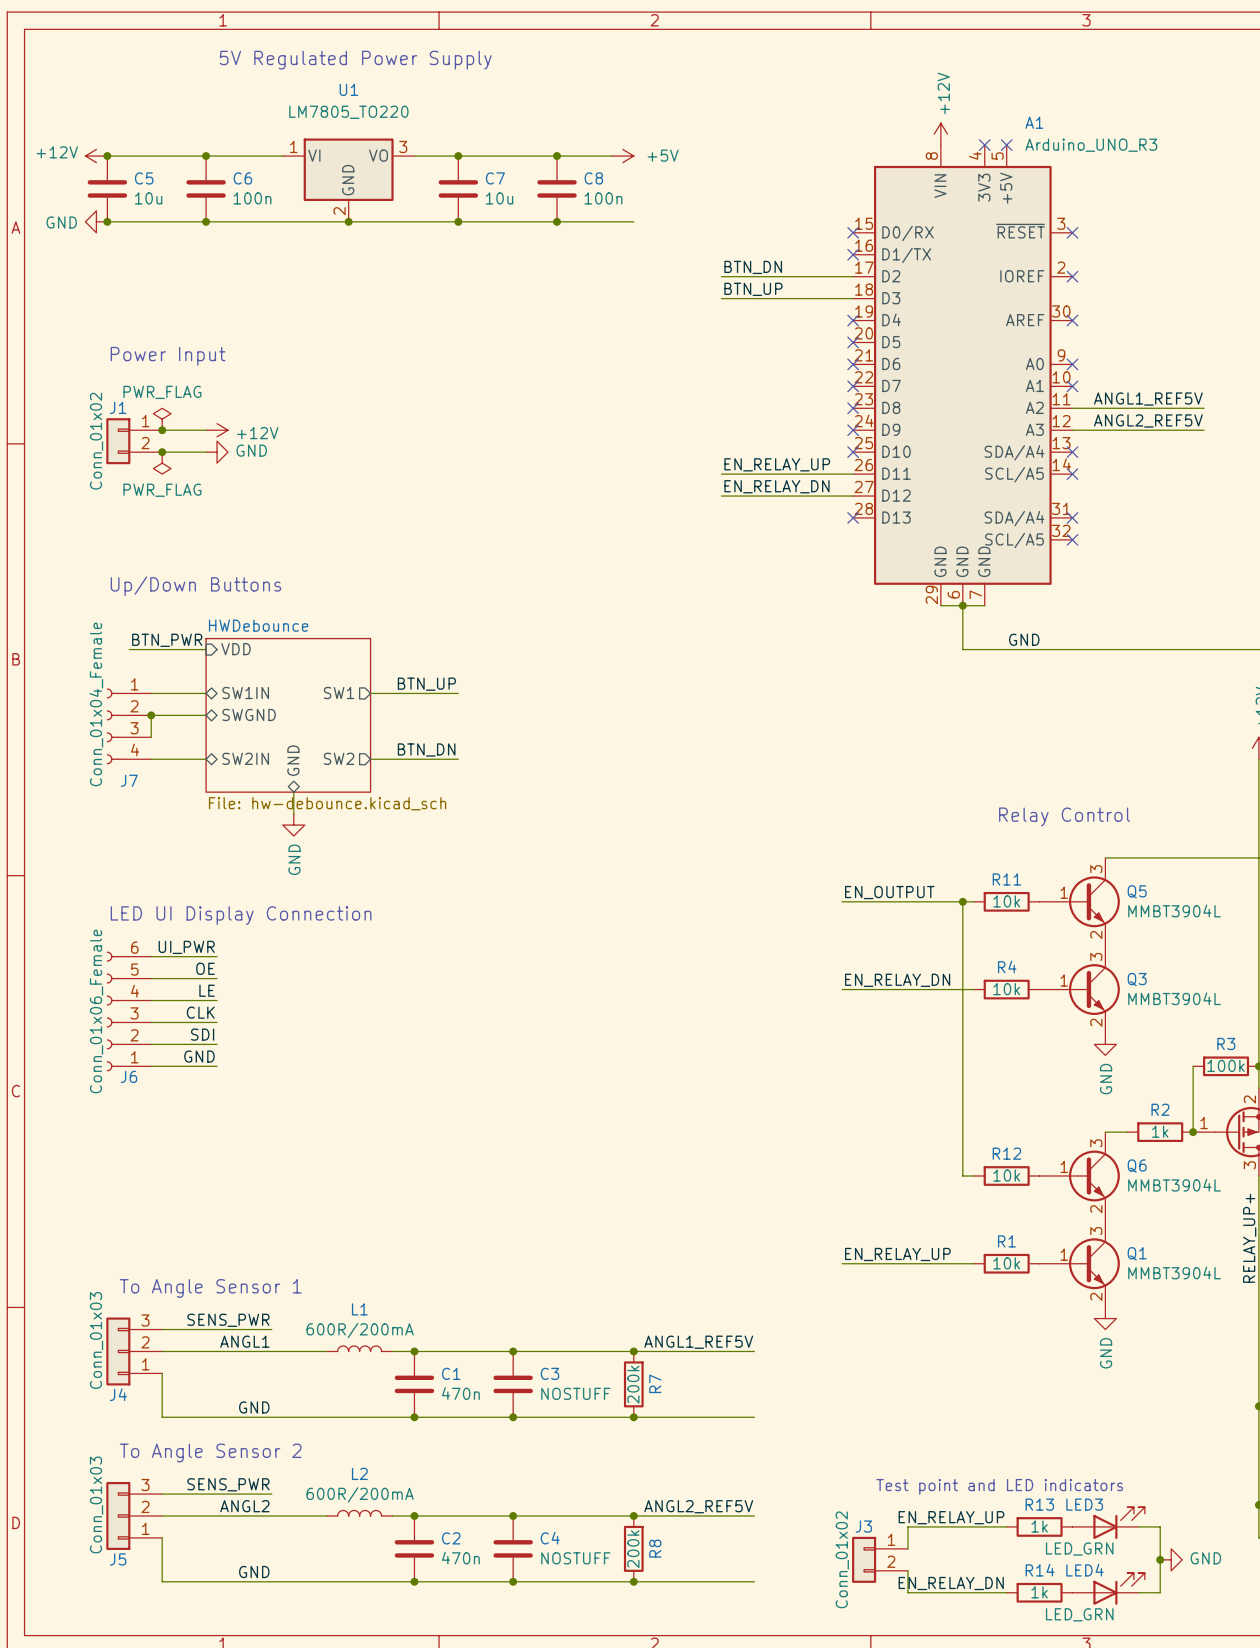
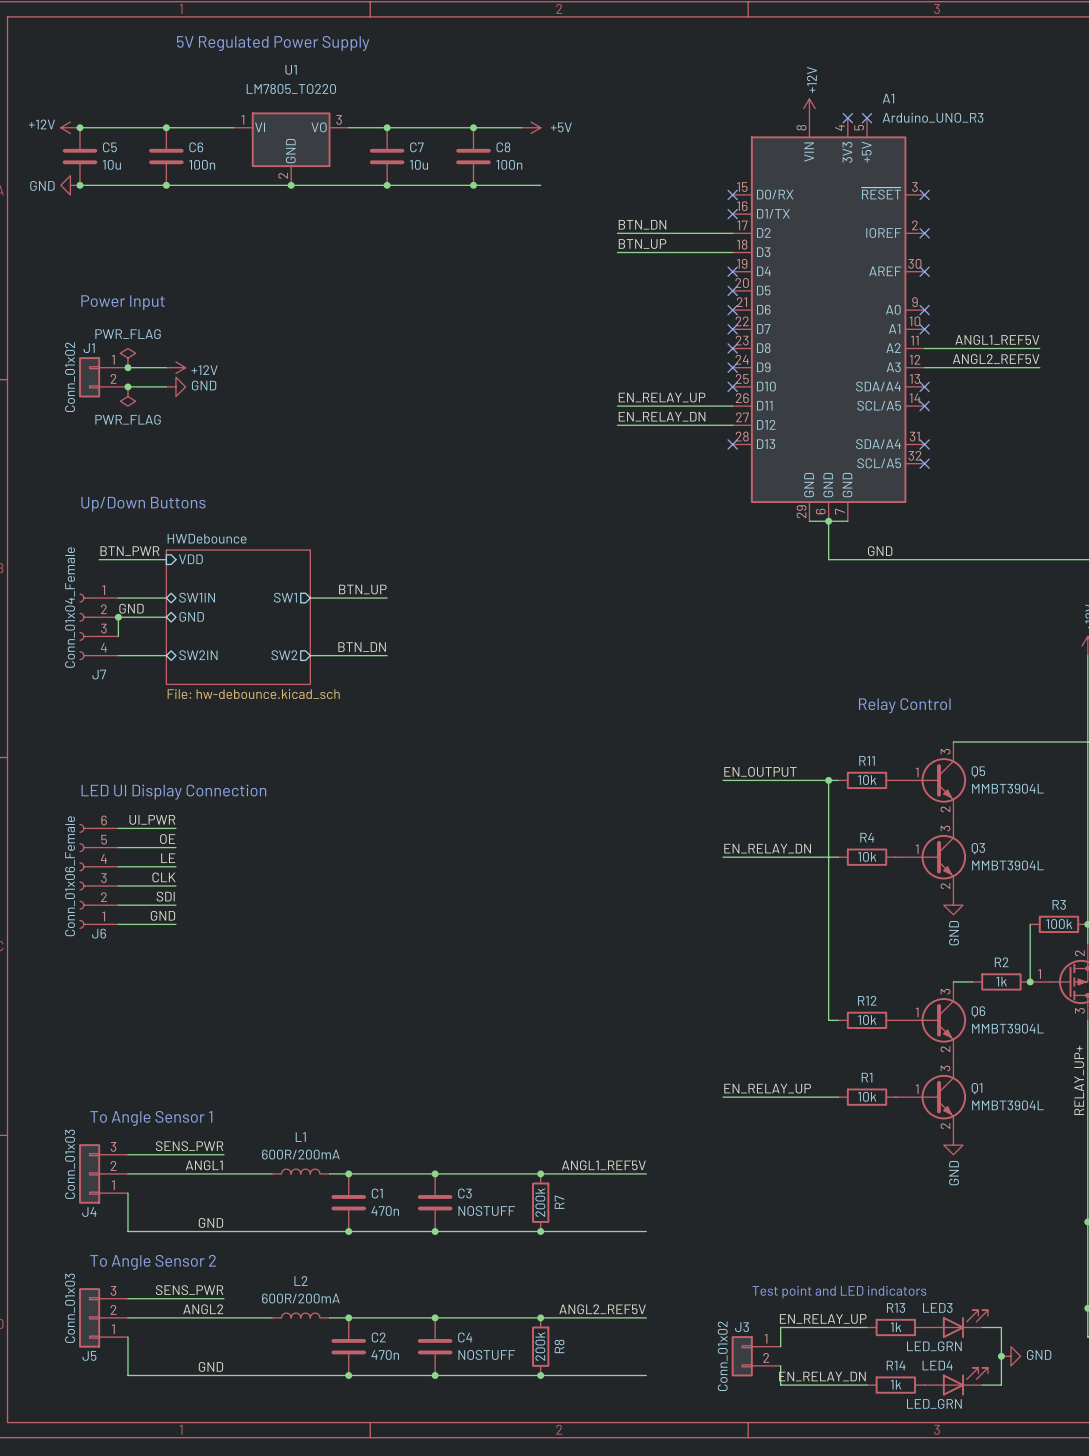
label: none -> GND (131, 608)
sheet pin: SWGND (249, 714) -> GND (191, 616)
sheet pin: GND (293, 760) -> none
wire: (293, 792) (293, 814) -> none
power symbol: GND (293, 825) -> none

